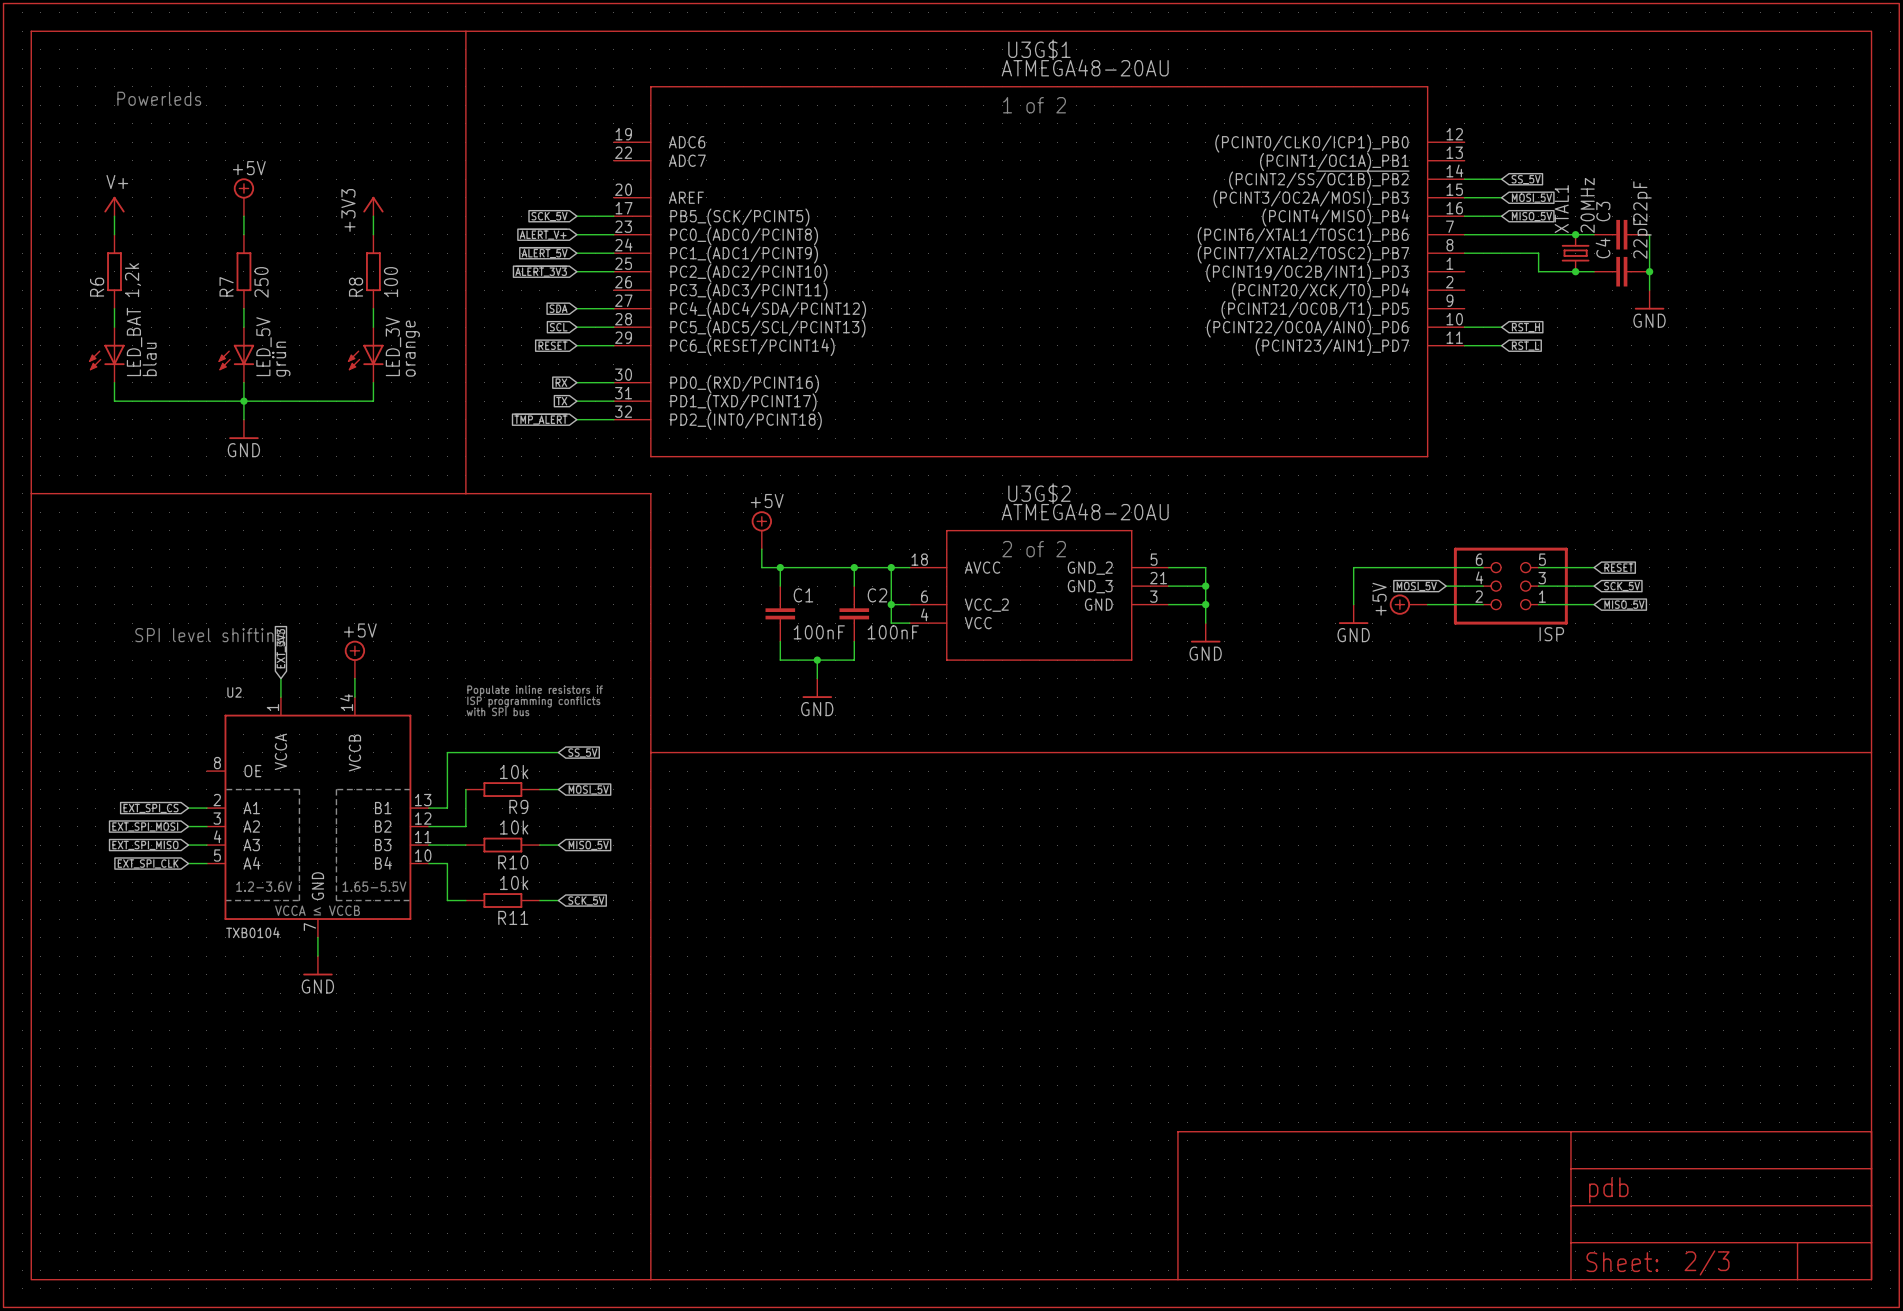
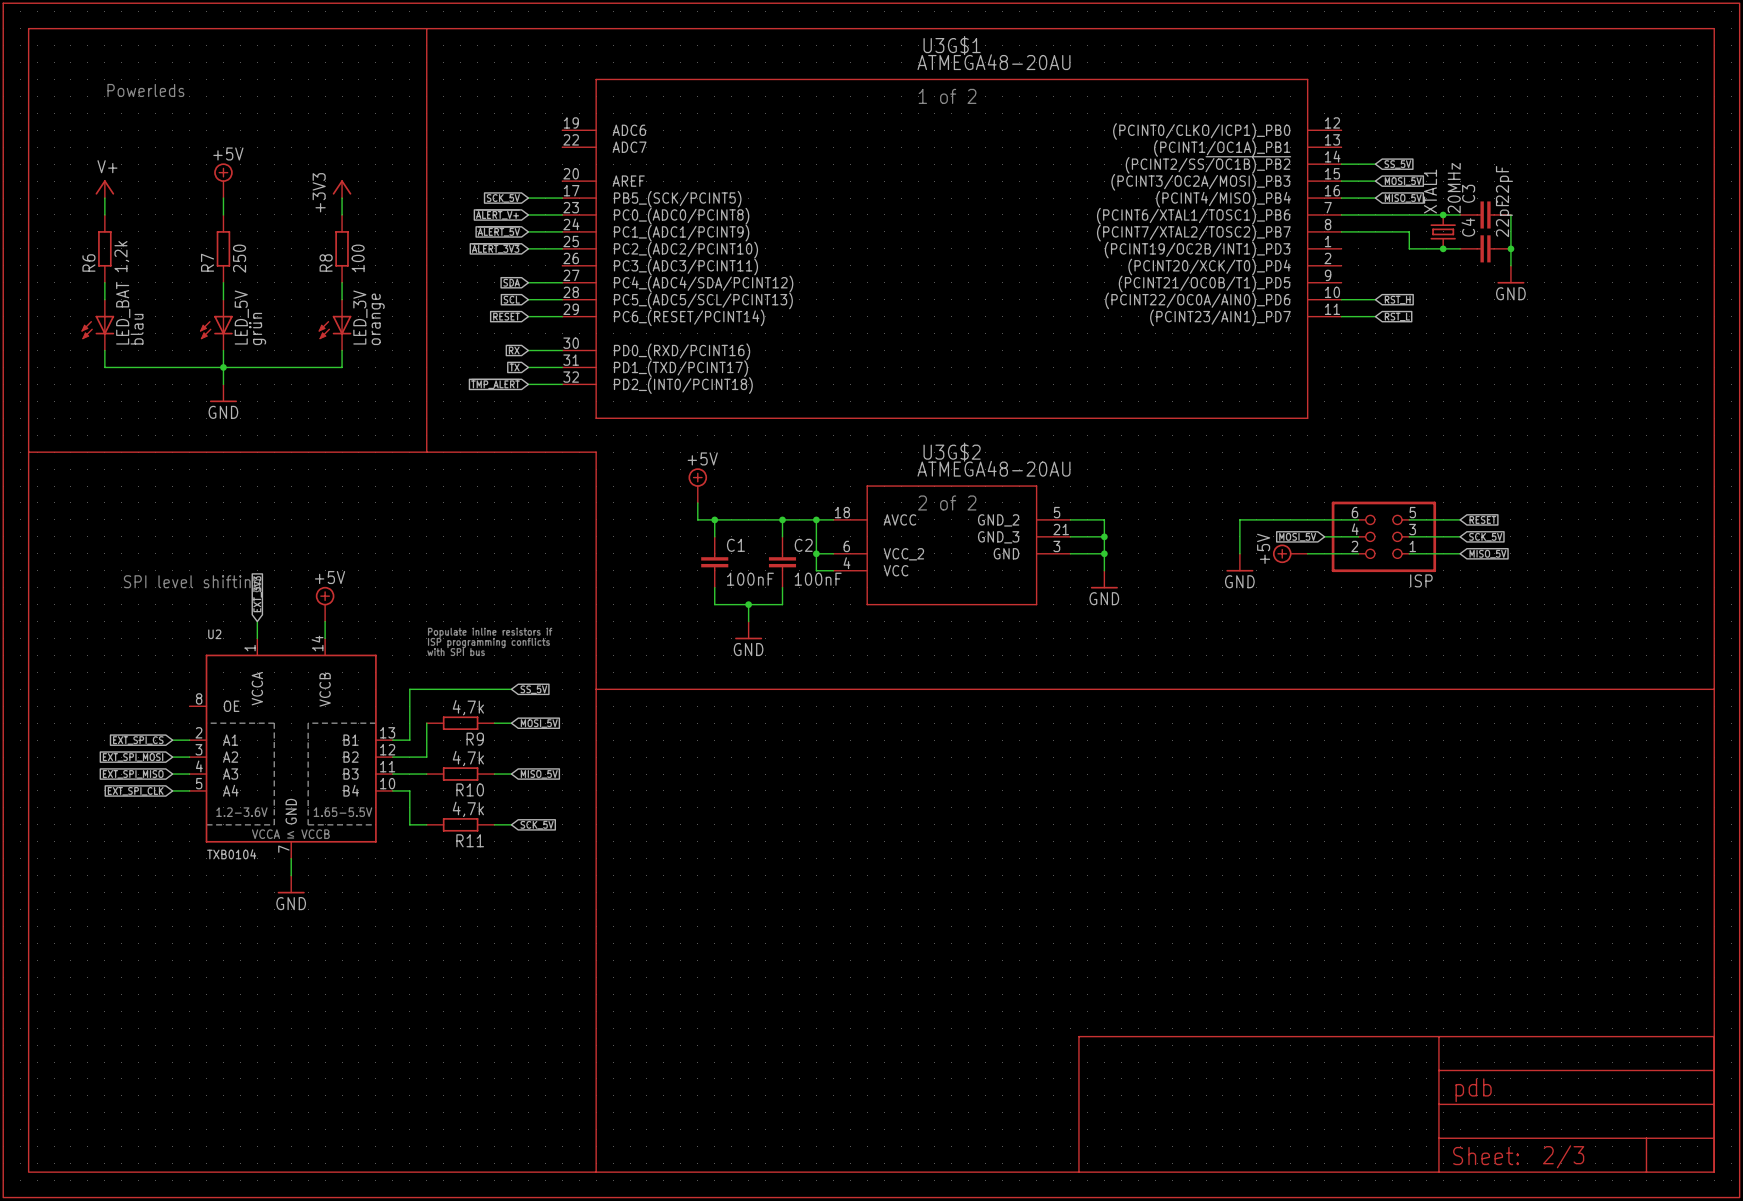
R9 value: 10k (514, 771) -> 4,7k (468, 707)
R10 value: 10k (514, 827) -> 4,7k (468, 758)
R11 value: 10k (514, 882) -> 4,7k (468, 809)

